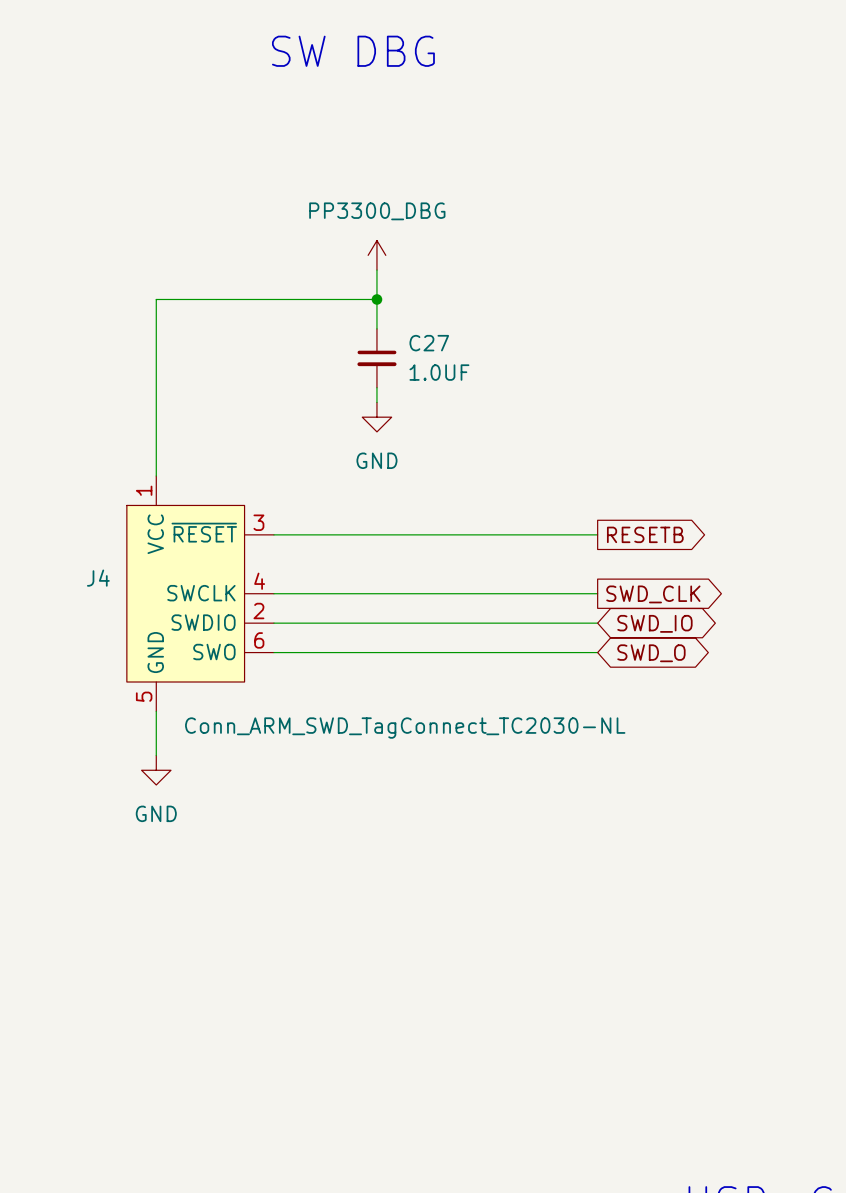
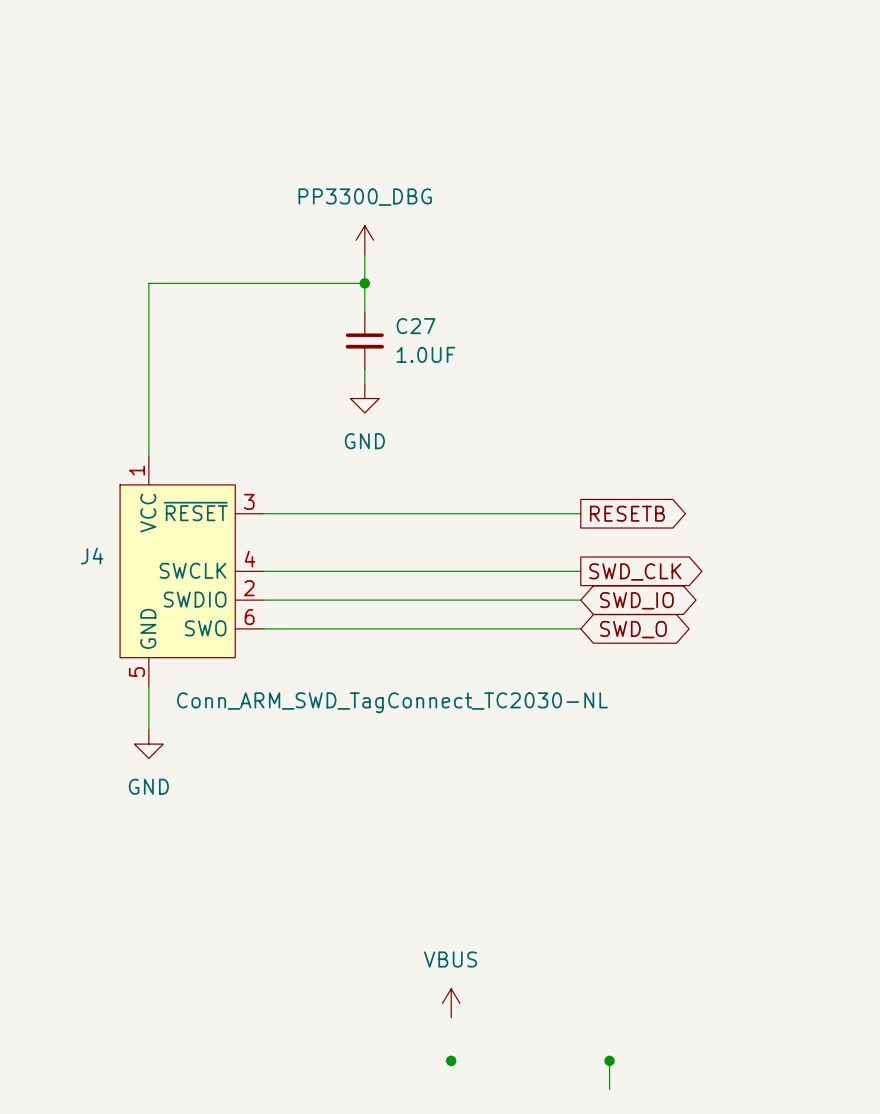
text: SW DBG (353, 51) -> none
power symbol: none -> VBUS (451, 1003)
junction: none -> (451, 1060)
wire: none -> (609, 1060) (609, 1089)
junction: none -> (609, 1060)

